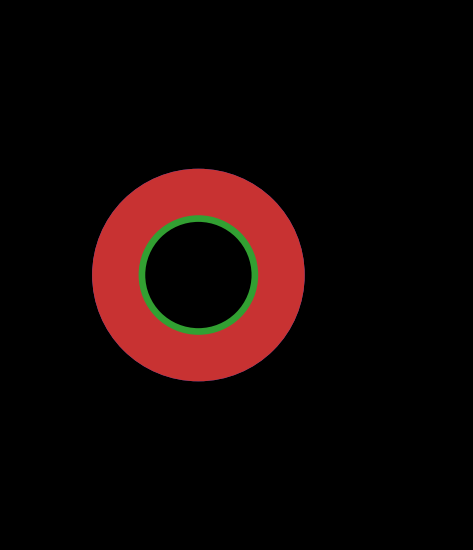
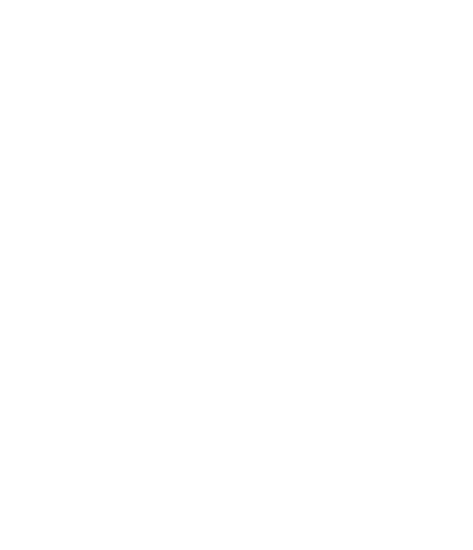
part: (198, 275) -> none

